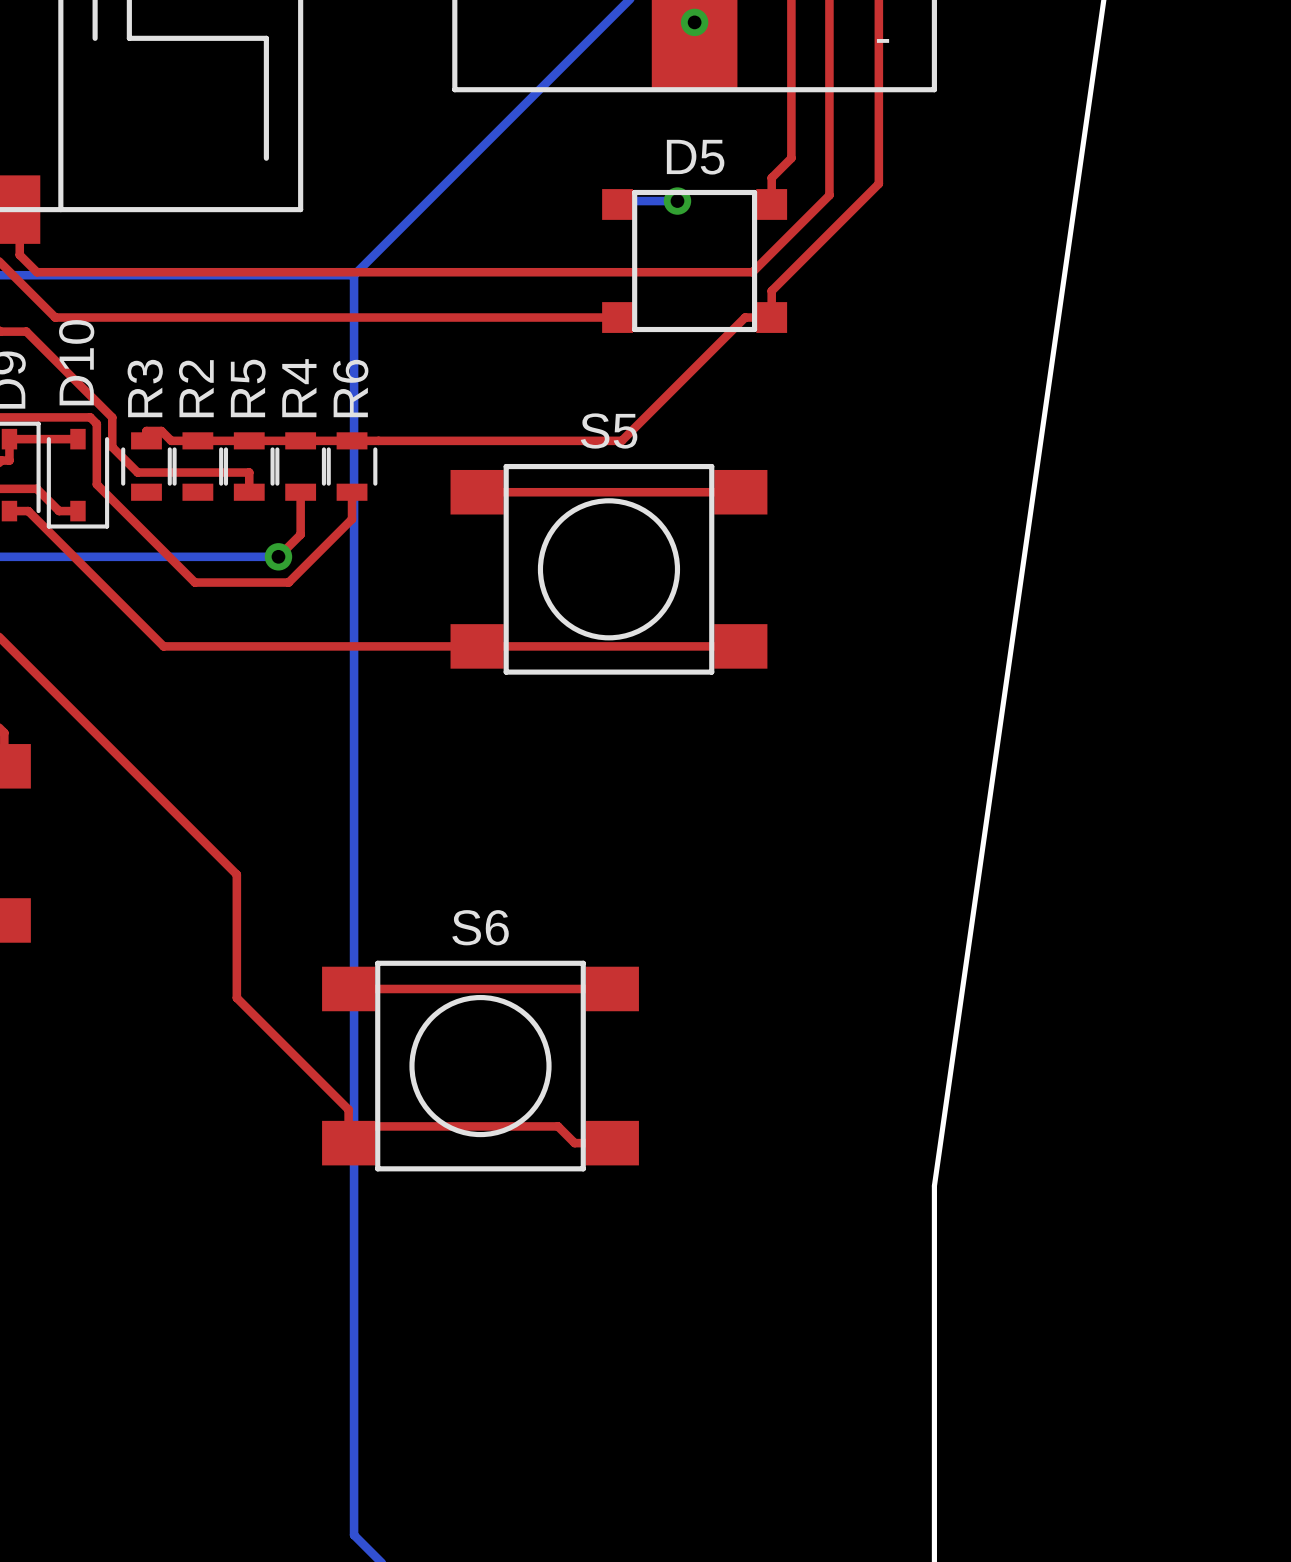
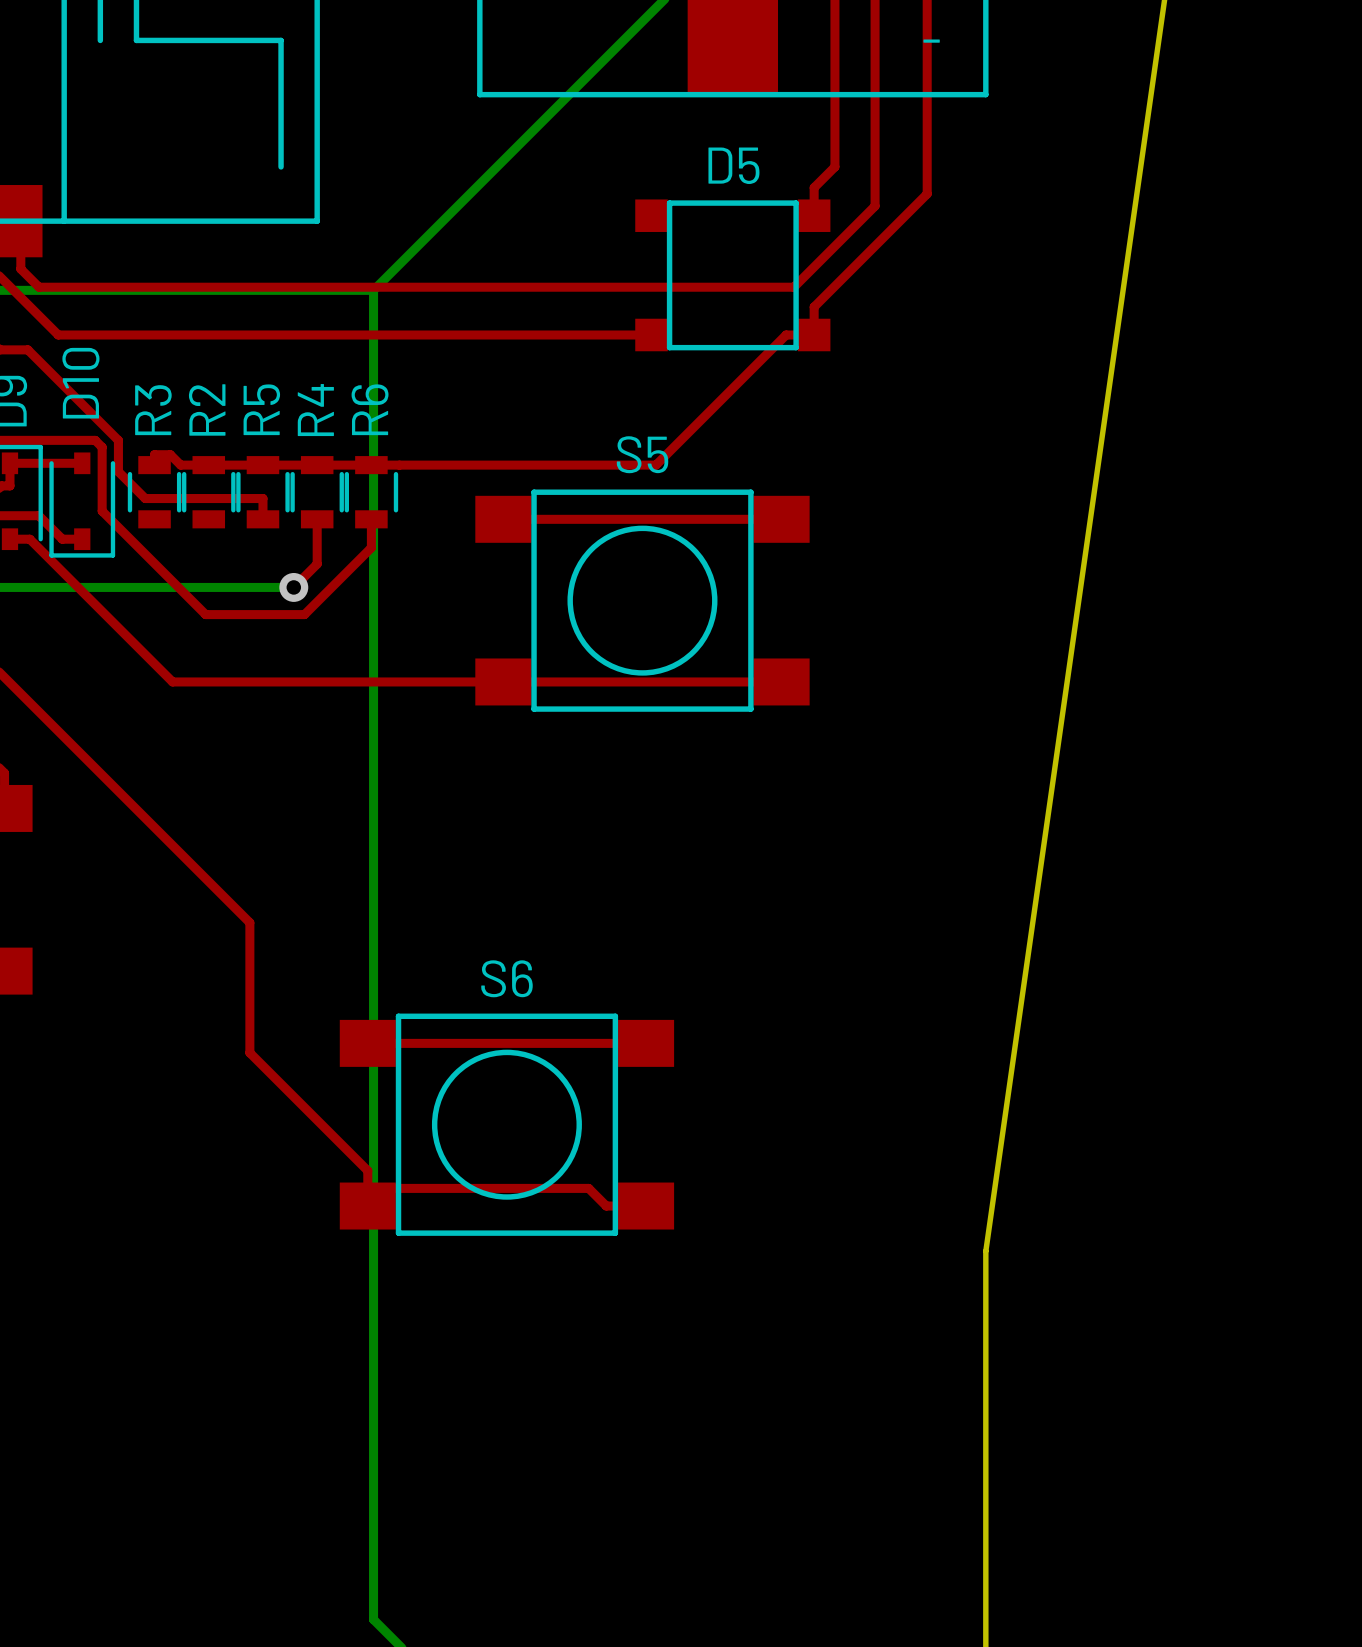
via: (694, 22) -> none
bottom track: (626, 201) (677, 201) -> none
via: (677, 201) -> none

